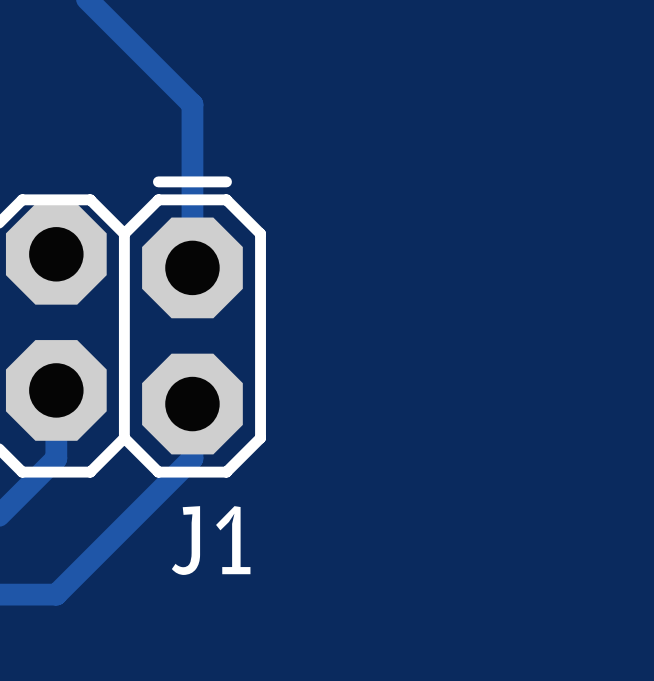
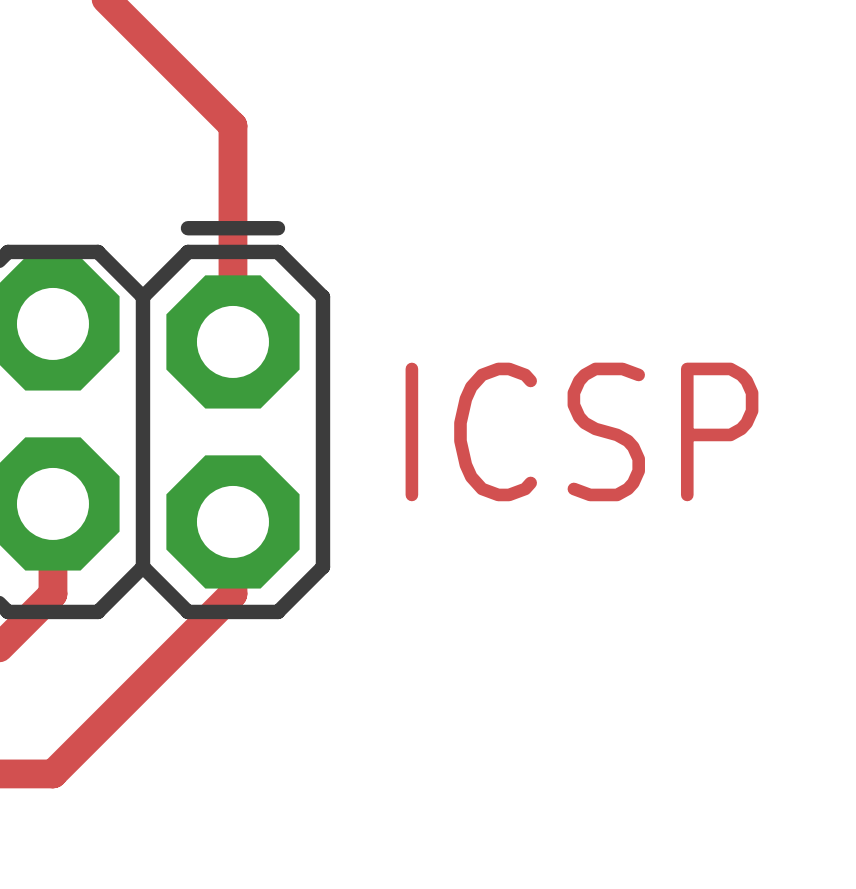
J1 name: J1 (211, 540) -> ICSP (581, 431)

